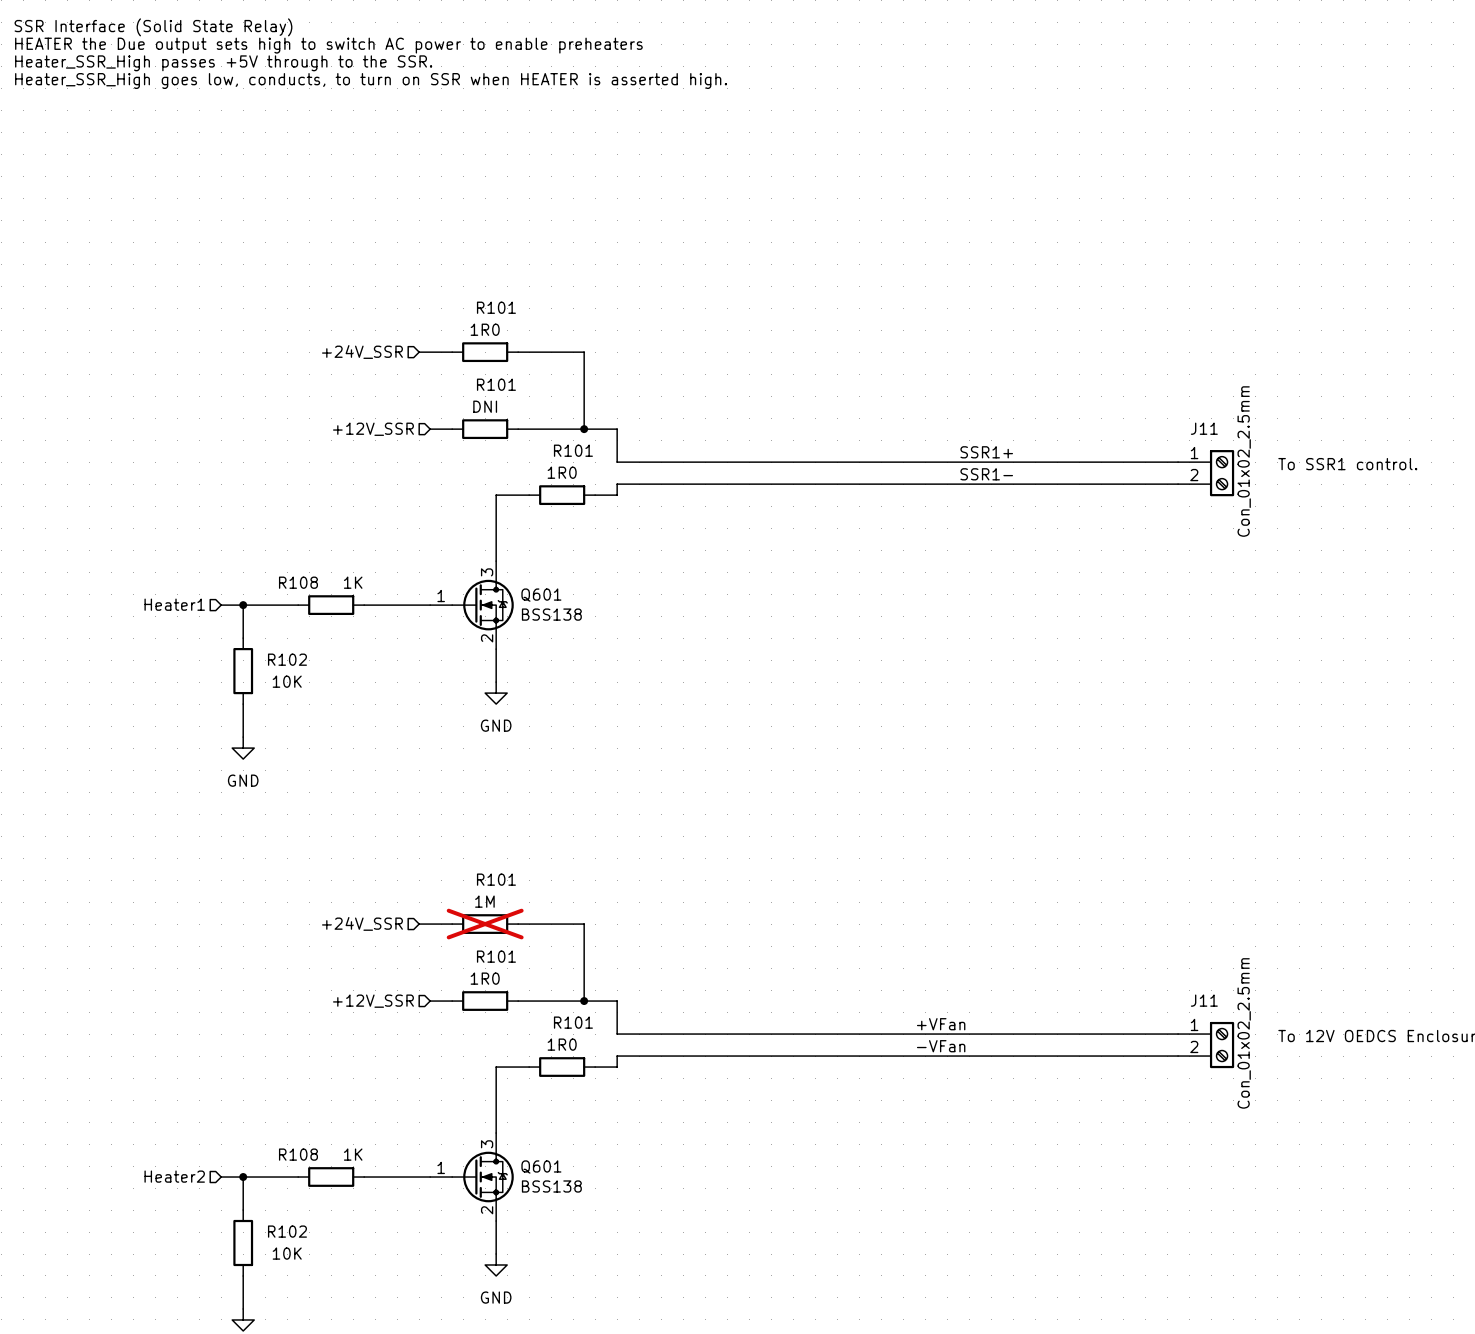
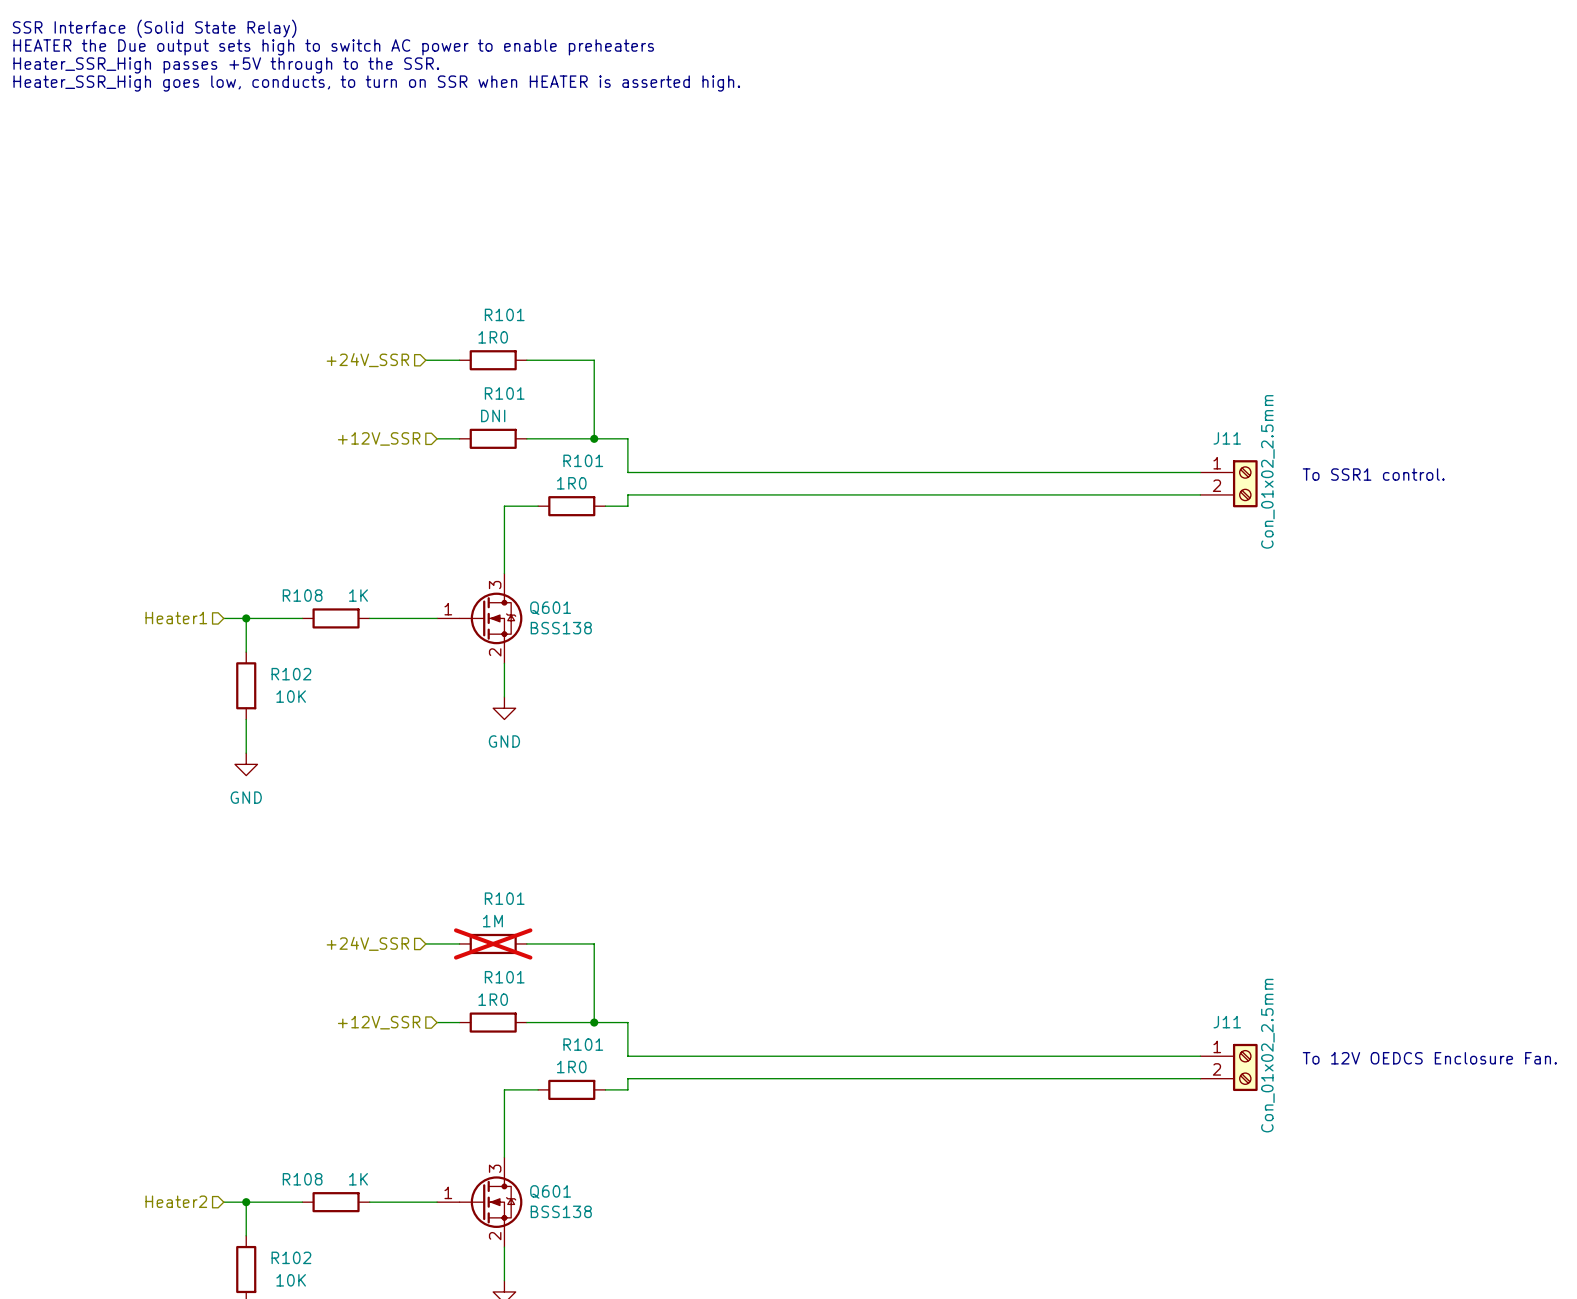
label: SSR1+ (986, 452) -> none
label: SSR1- (986, 474) -> none
label: +VFan (941, 1024) -> none
label: -VFan (941, 1046) -> none

